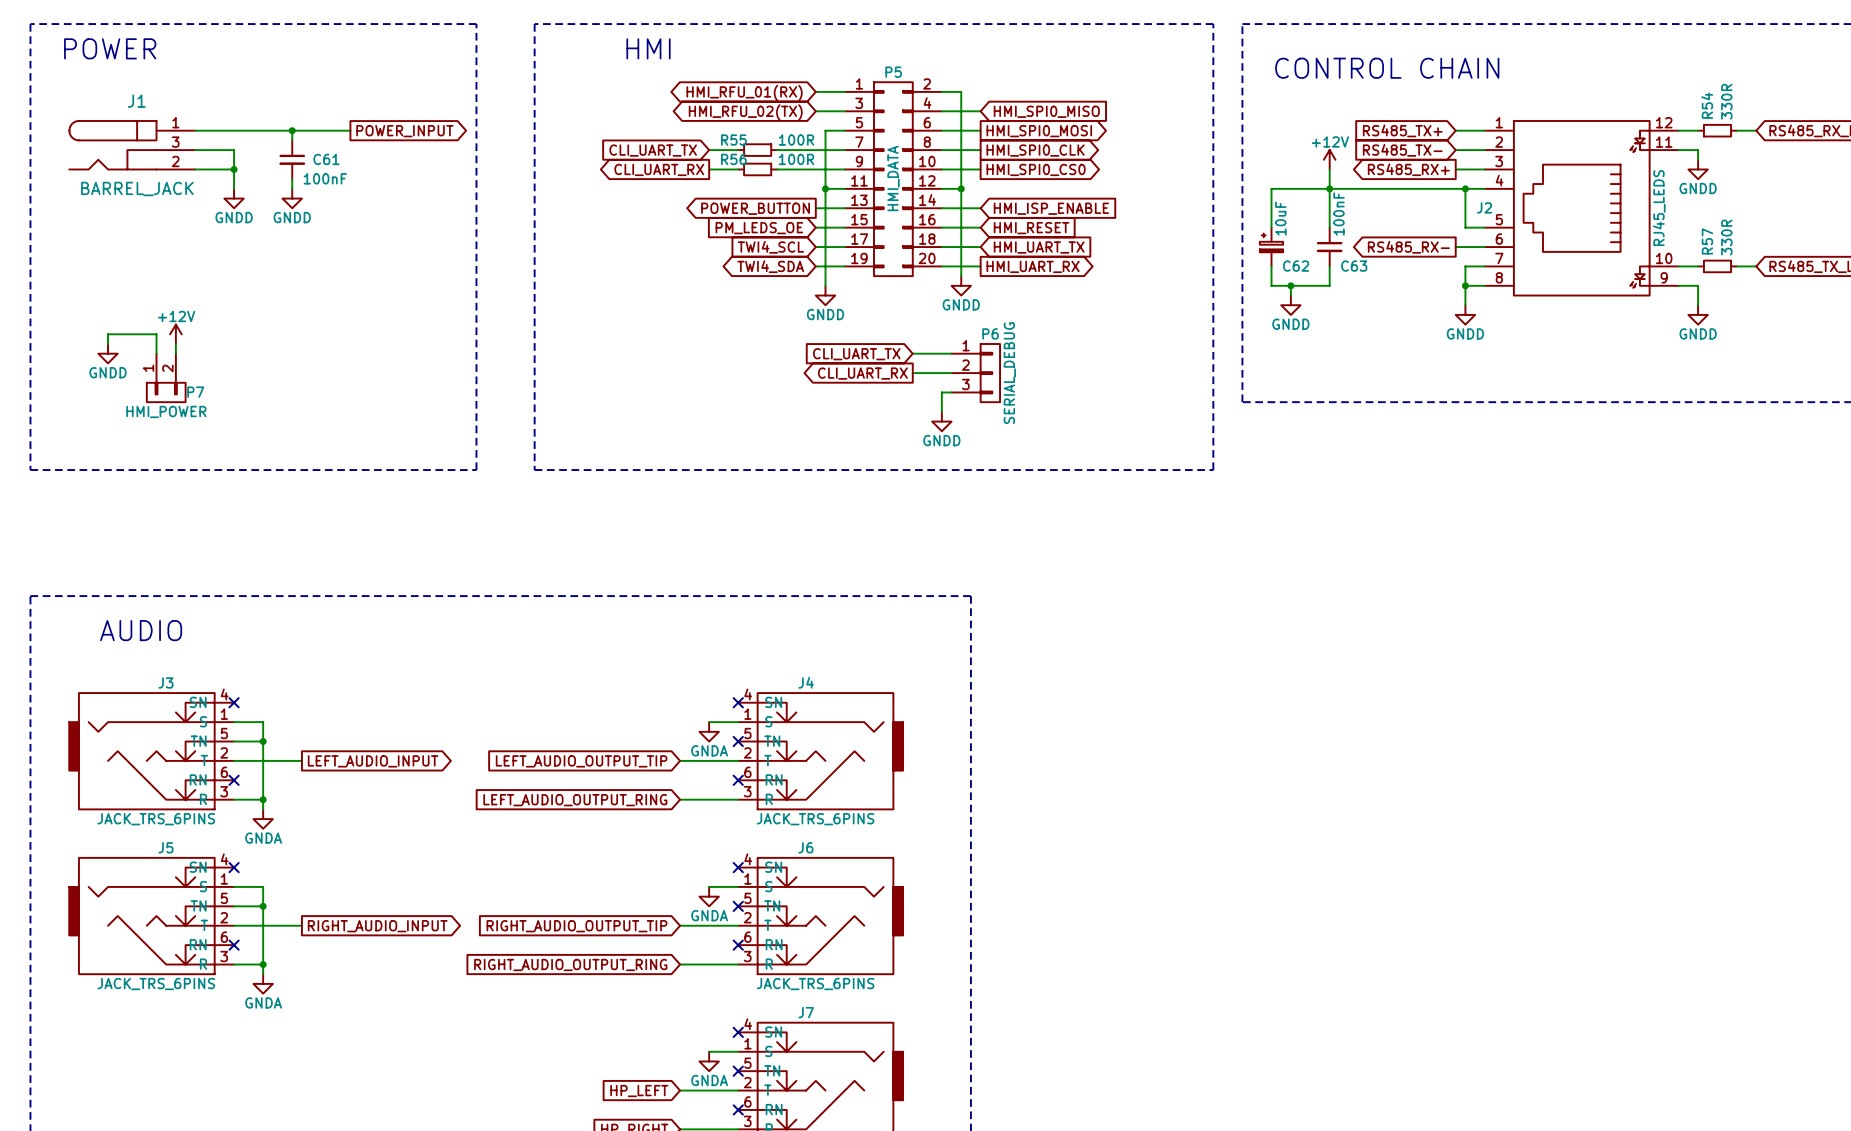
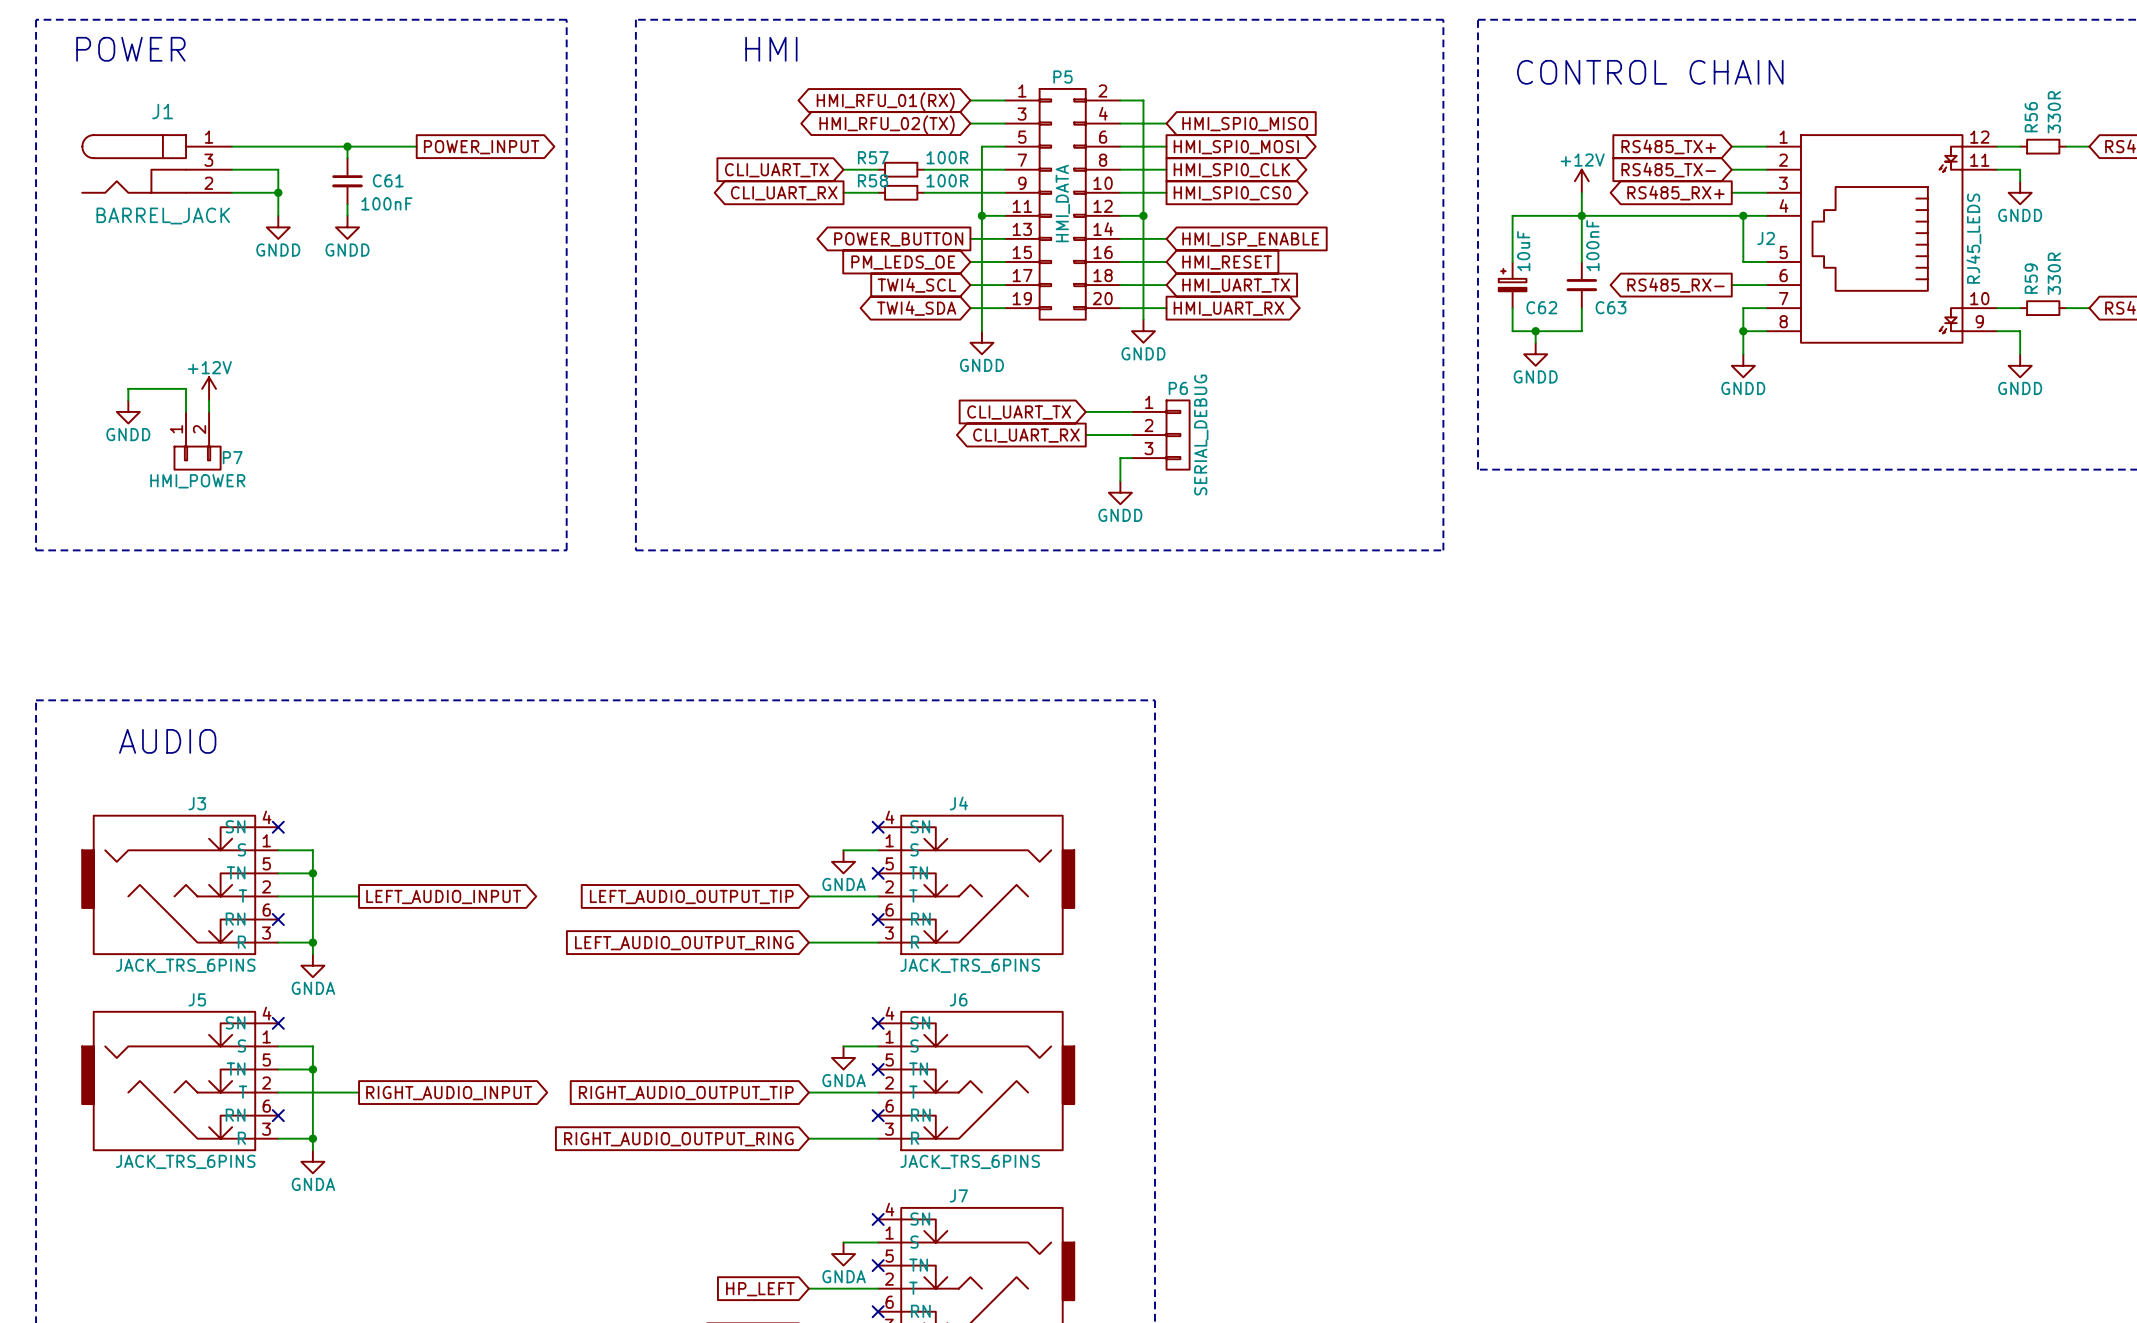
R54 name: R54 (1707, 105) -> R56 (2031, 117)
R55 name: R55 (733, 140) -> R57 (873, 157)
R56 name: R56 (733, 159) -> R58 (873, 180)
R57 name: R57 (1707, 241) -> R59 (2031, 278)

